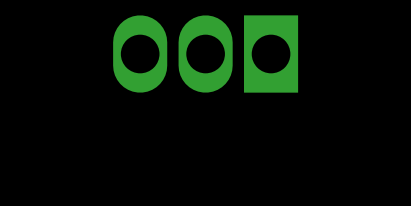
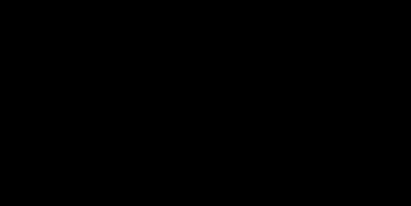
part: (205, 54) -> none

